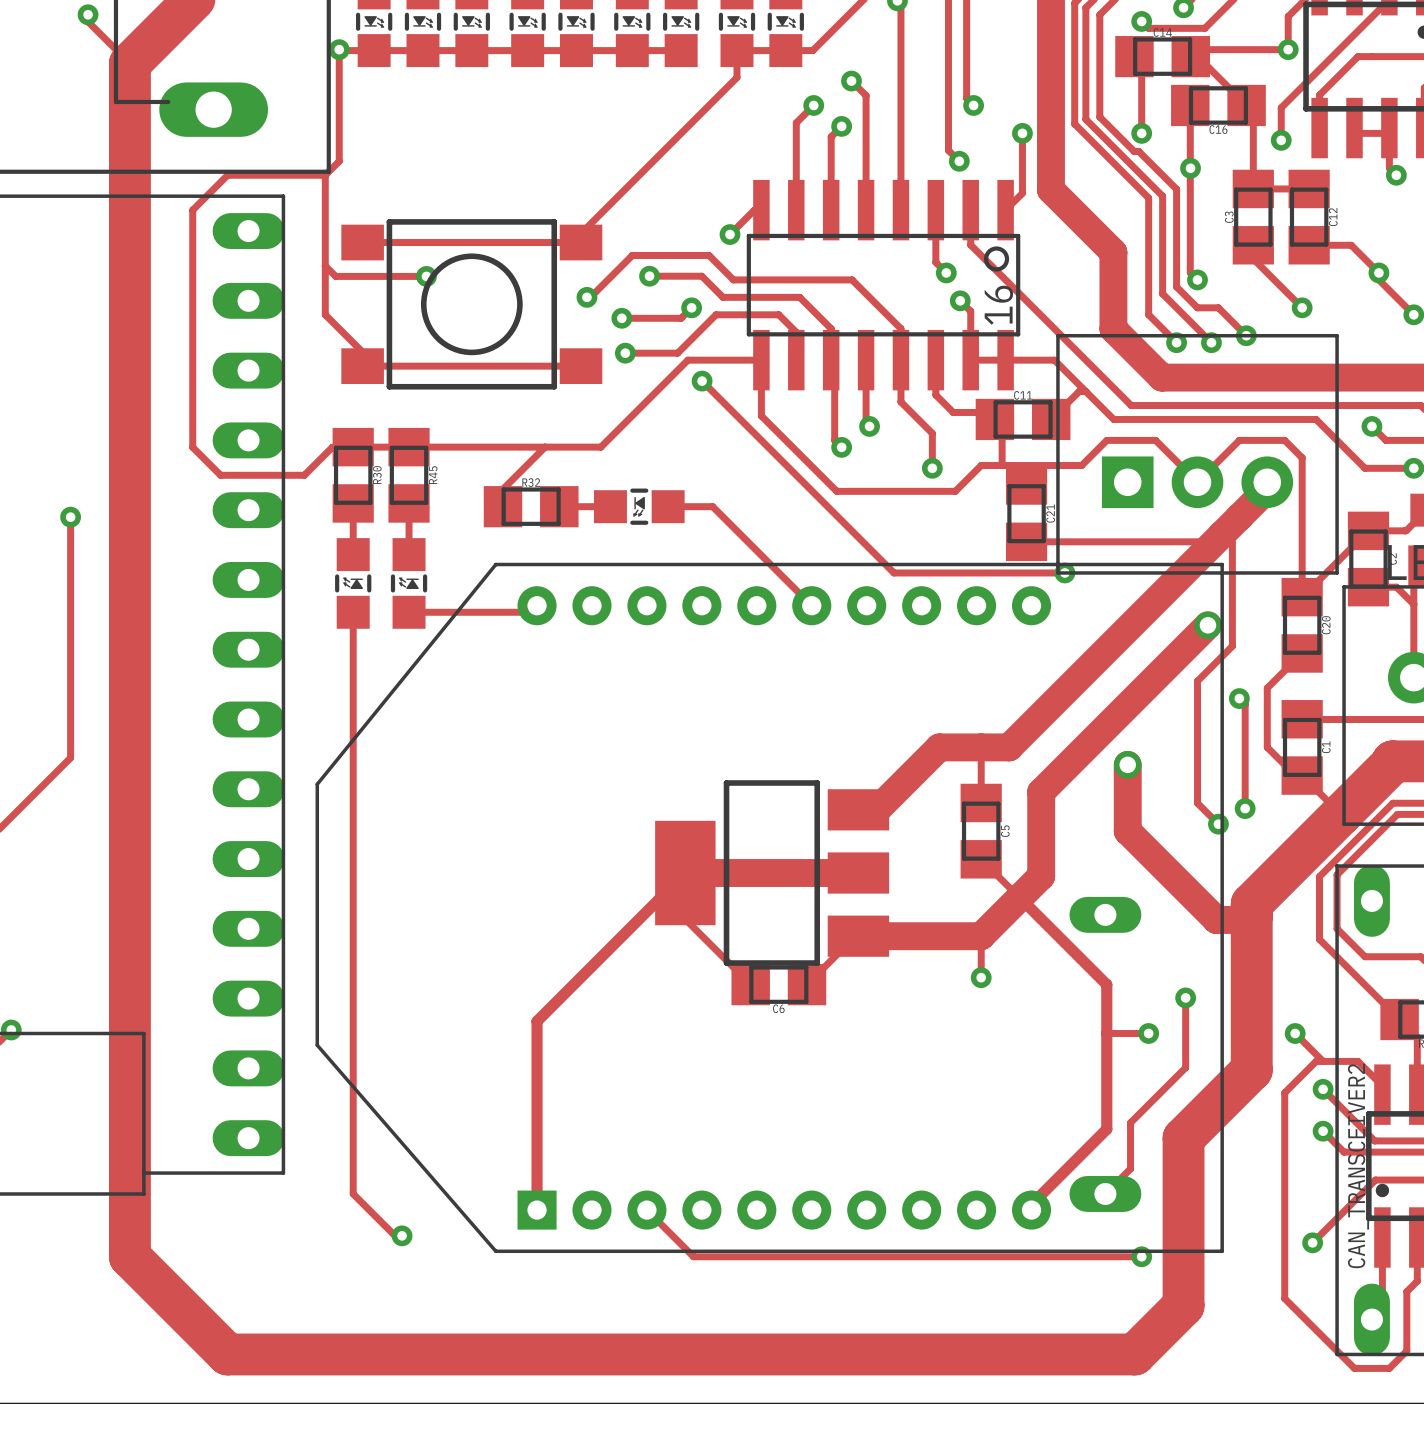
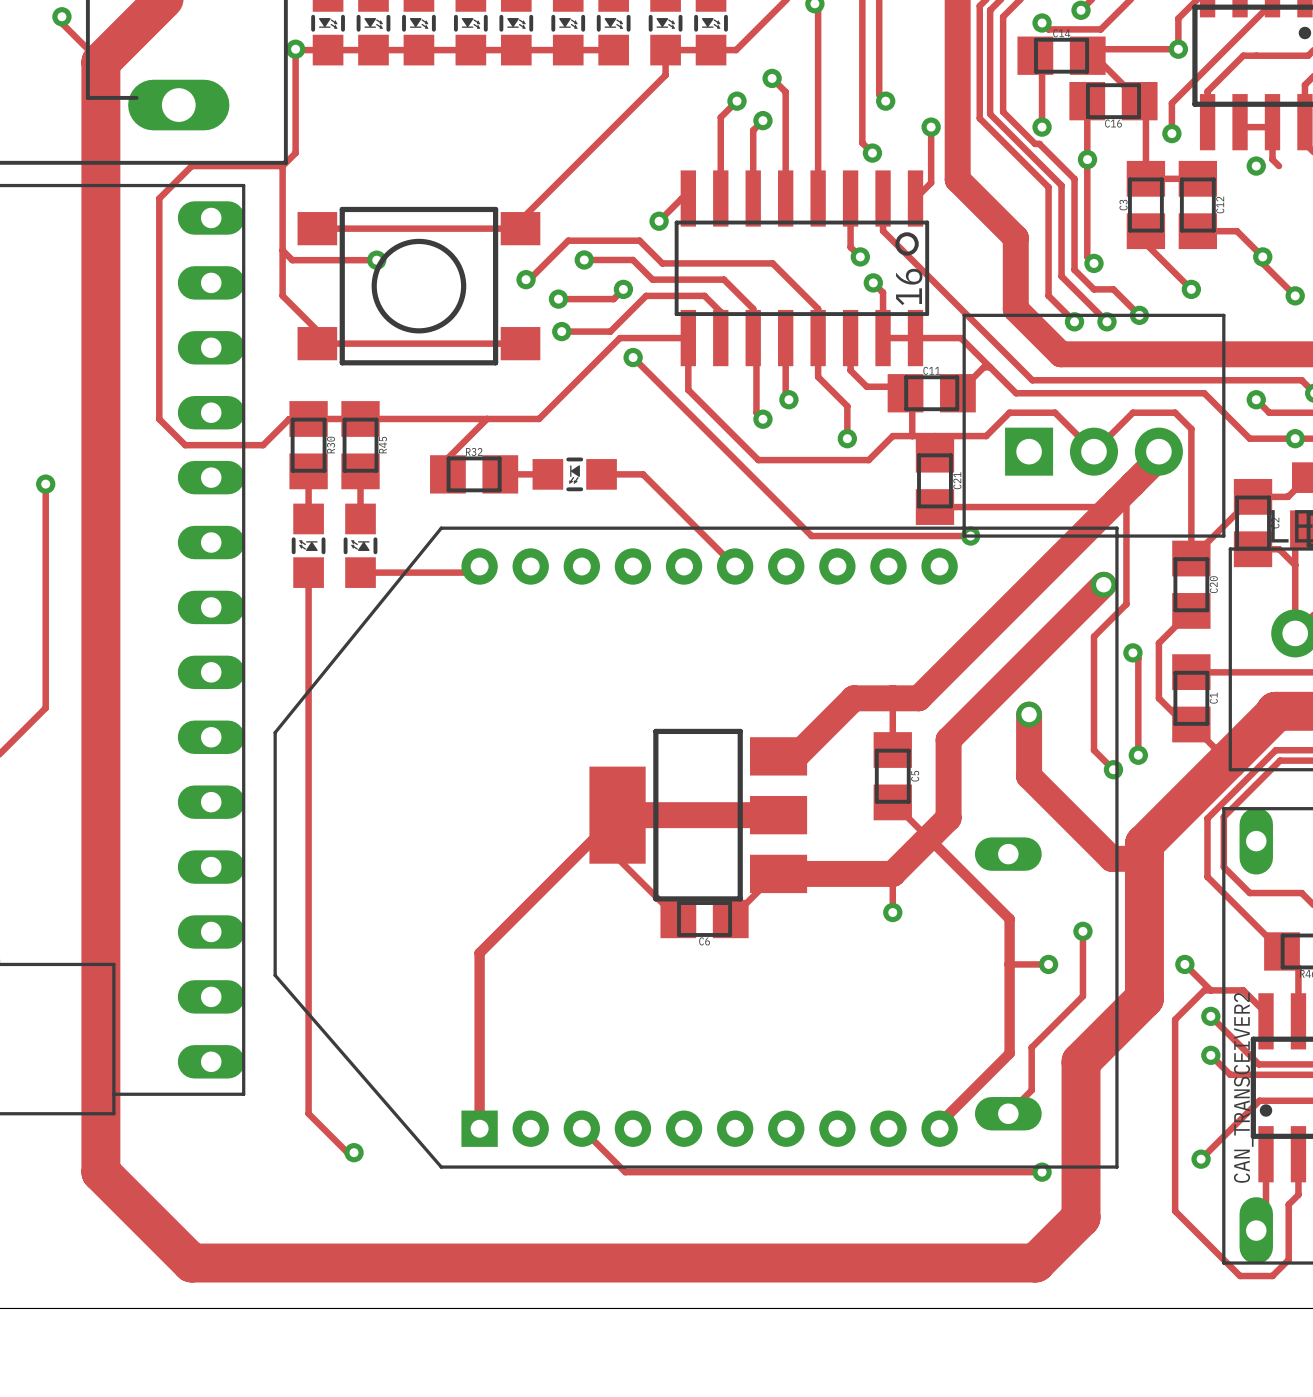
via position: (1396, 175) -> (1256, 166)

